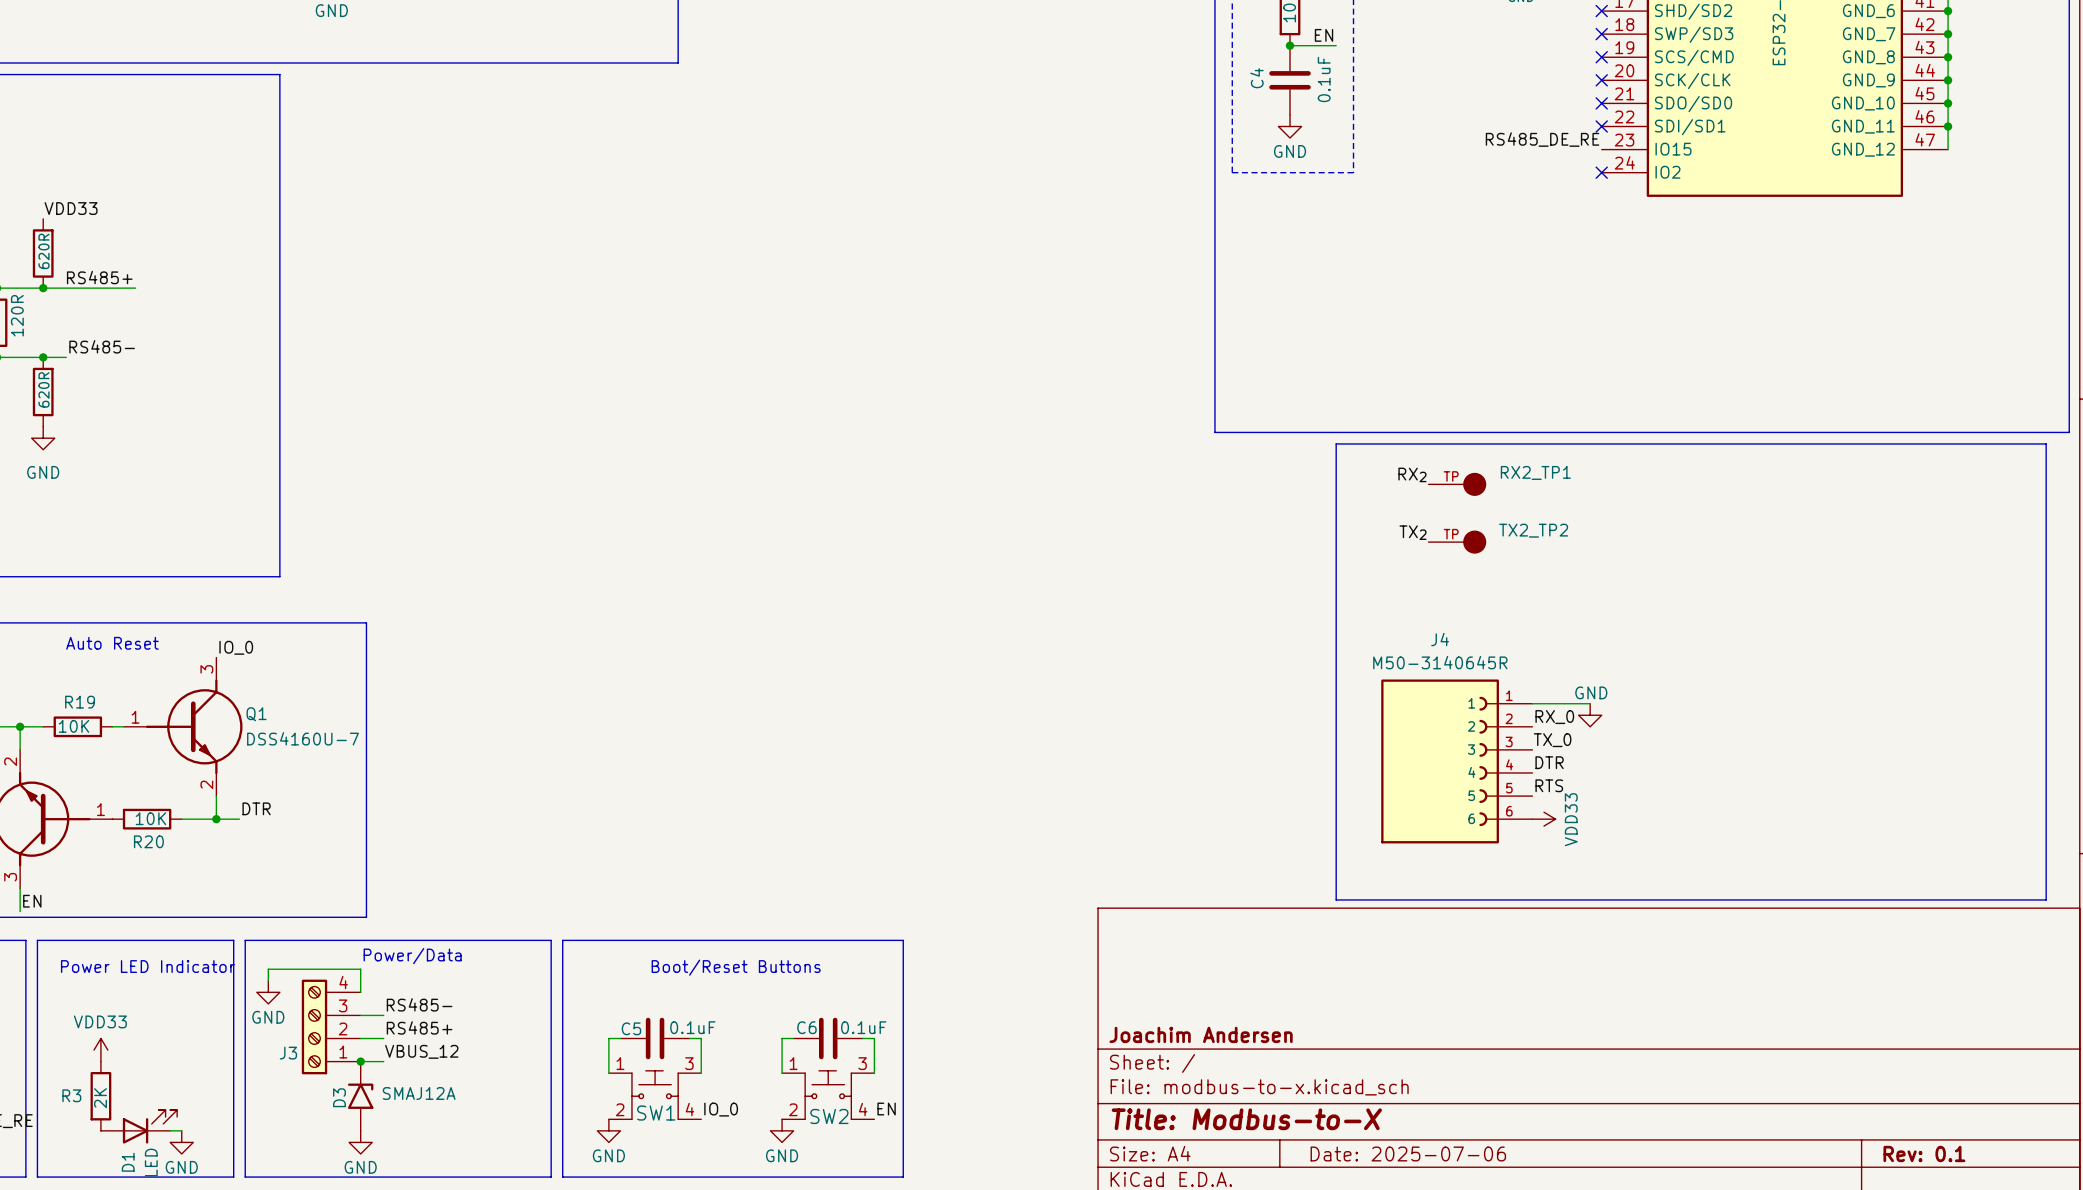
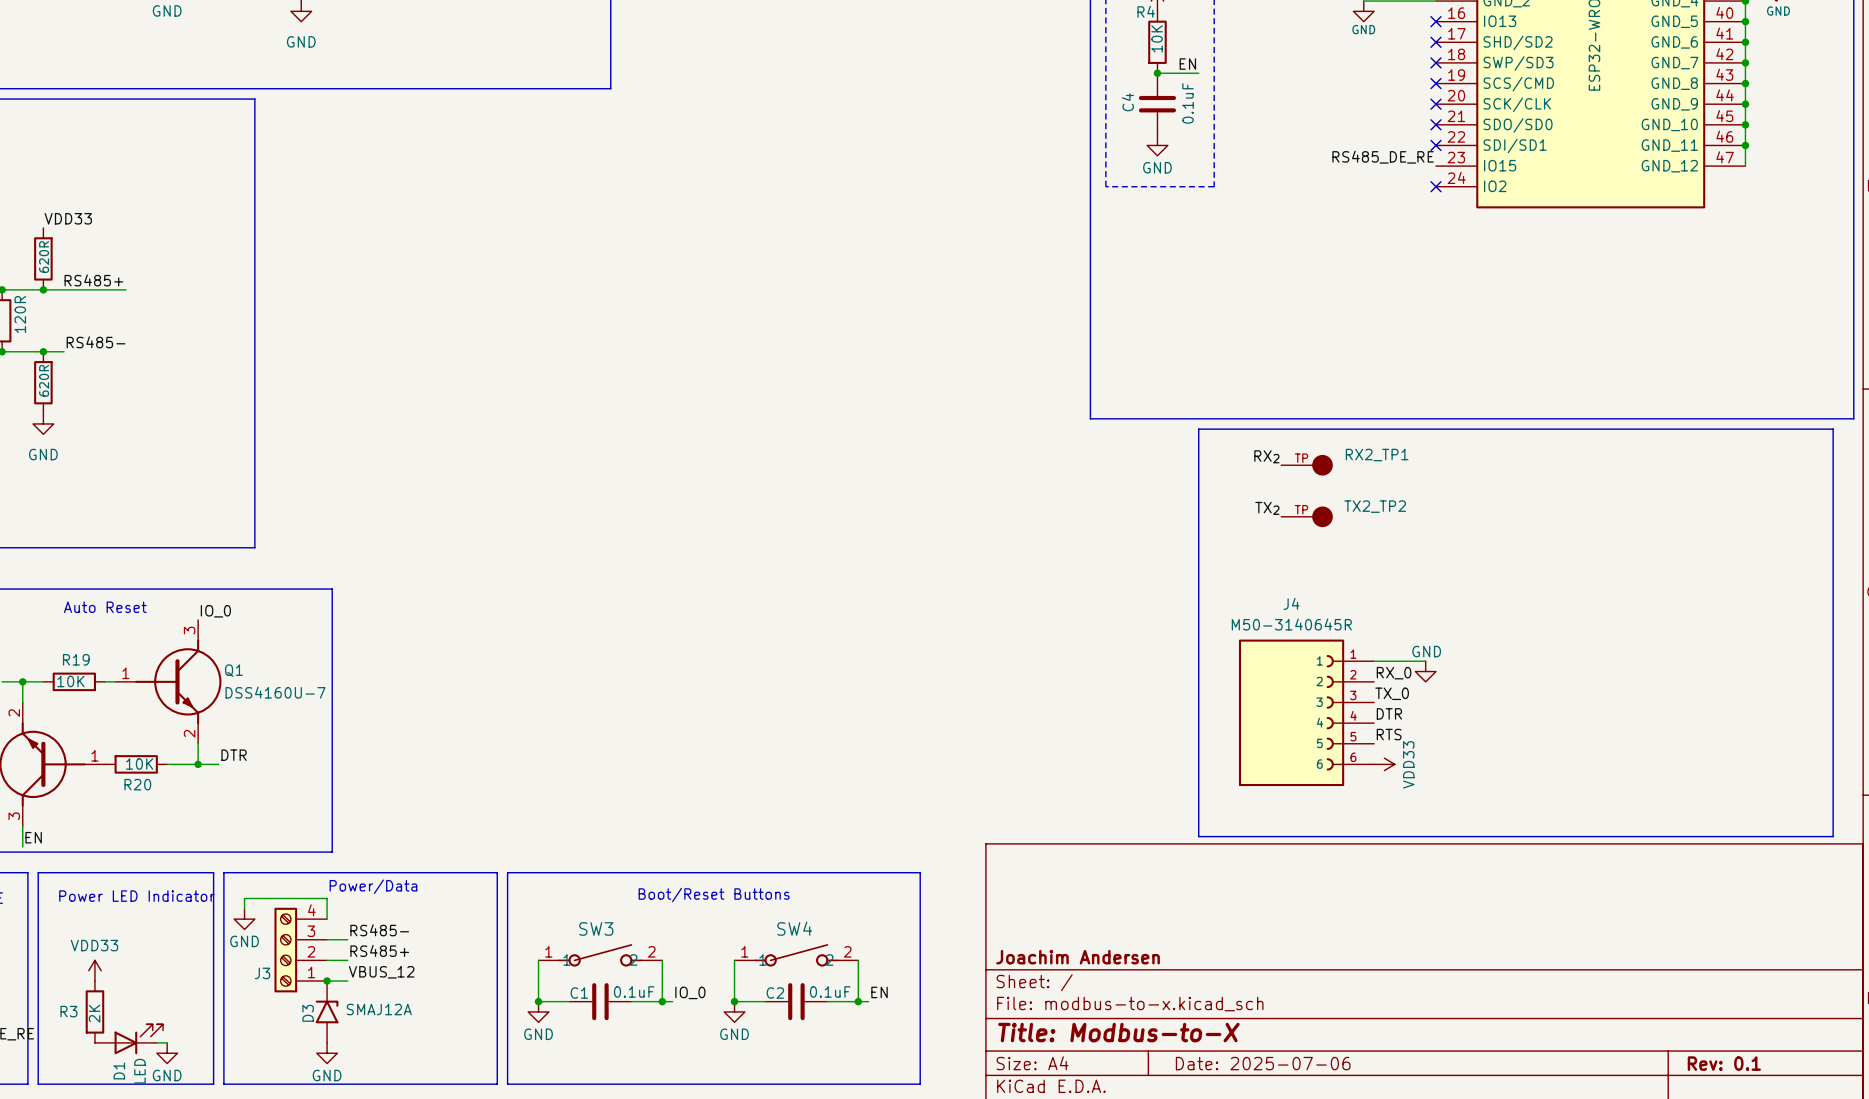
line: (903, 940) (903, 1177) -> (811, 872) (920, 872) (920, 1084) (811, 1084)
text position: Boot/Reset Buttons (736, 967) -> Boot/Reset Buttons (714, 894)
SW3: none -> (600, 955)
SW4: none -> (796, 955)
wire: none -> (538, 960) (538, 1001) (569, 1001)
wire: (620, 1038) (608, 1038) (608, 1073) -> none
C5: 0.1uF (655, 1038) -> none
wire: (689, 1038) (701, 1038) (701, 1073) -> none
wire: none -> (662, 960) (662, 1001)
wire: (793, 1038) (782, 1038) (782, 1073) -> none
wire: none -> (734, 960) (734, 1001) (765, 1001)
C6: 0.1uF (828, 1038) -> none
wire: (862, 1038) (874, 1038) (874, 1073) -> none
wire: none -> (858, 960) (858, 1001)
junction: none -> (538, 1001)
C1: none -> 0.1uF (600, 1001)
wire: none -> (631, 1001) (672, 1001)
junction: none -> (662, 1001)
junction: none -> (734, 1001)
C2: none -> 0.1uF (796, 1001)
wire: none -> (827, 1001) (868, 1001)
junction: none -> (858, 1001)
SW1: (655, 1095) -> none
SW2: (828, 1095) -> none
label position: IO_0 (721, 1109) -> IO_0 (690, 992)
label position: EN (886, 1109) -> EN (879, 992)
power symbol position: GND (608, 1130) -> GND (538, 1011)
power symbol position: GND (782, 1130) -> GND (734, 1011)

